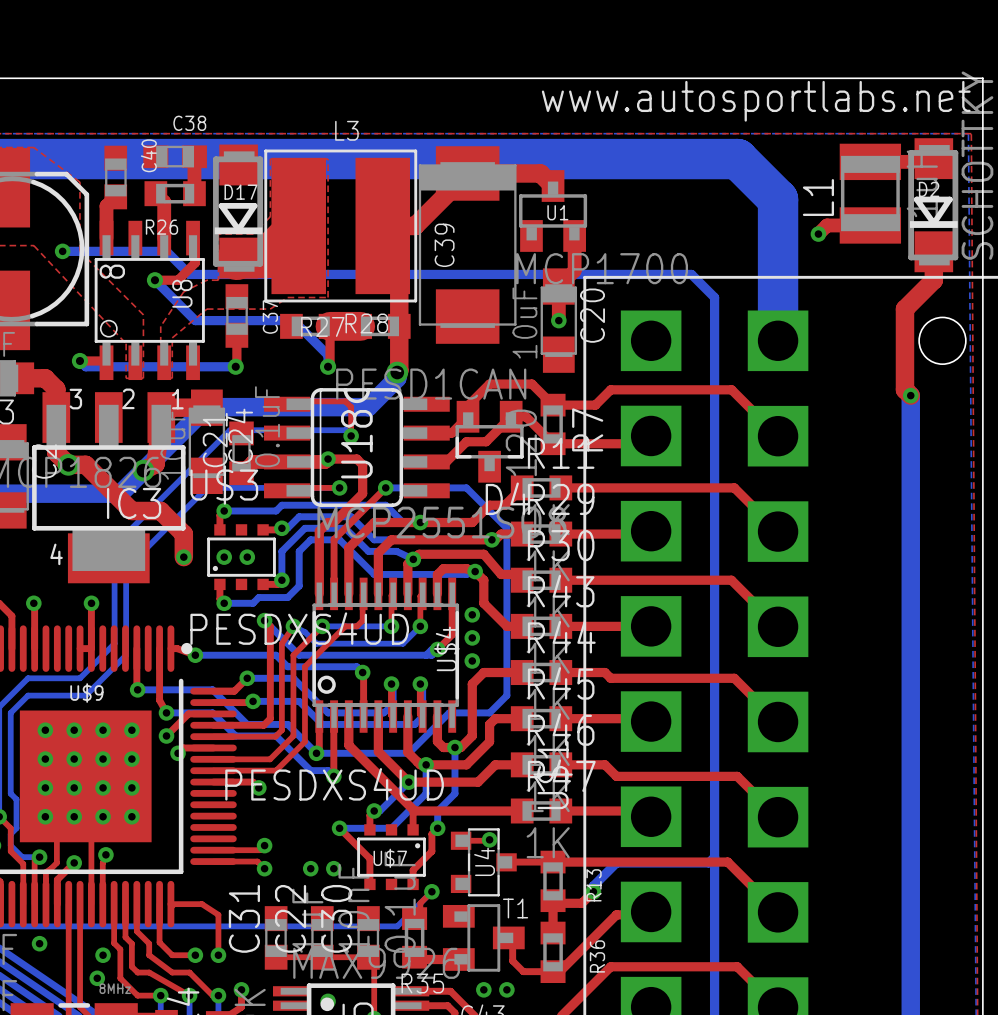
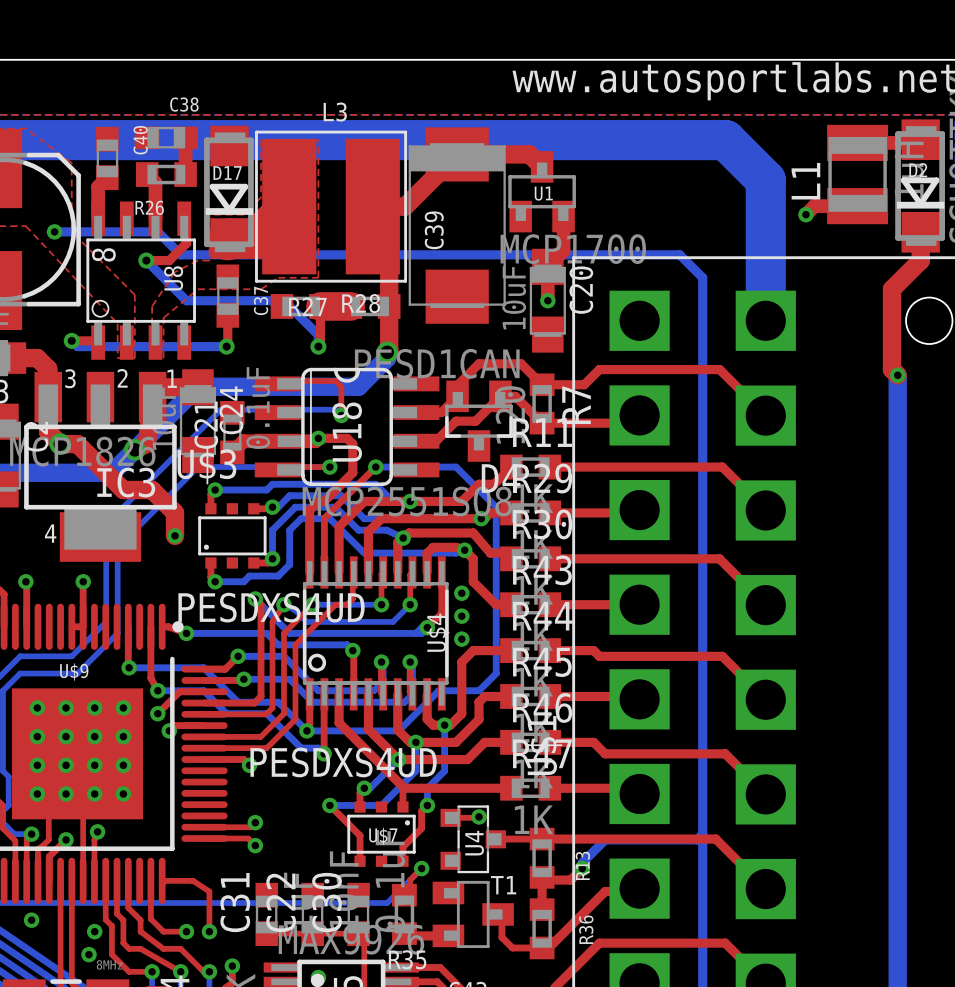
via: (224, 557) -> none
via: (247, 557) -> none
via: (310, 868) -> none
via: (333, 868) -> none
via: (483, 989) -> none
via: (506, 989) -> none

